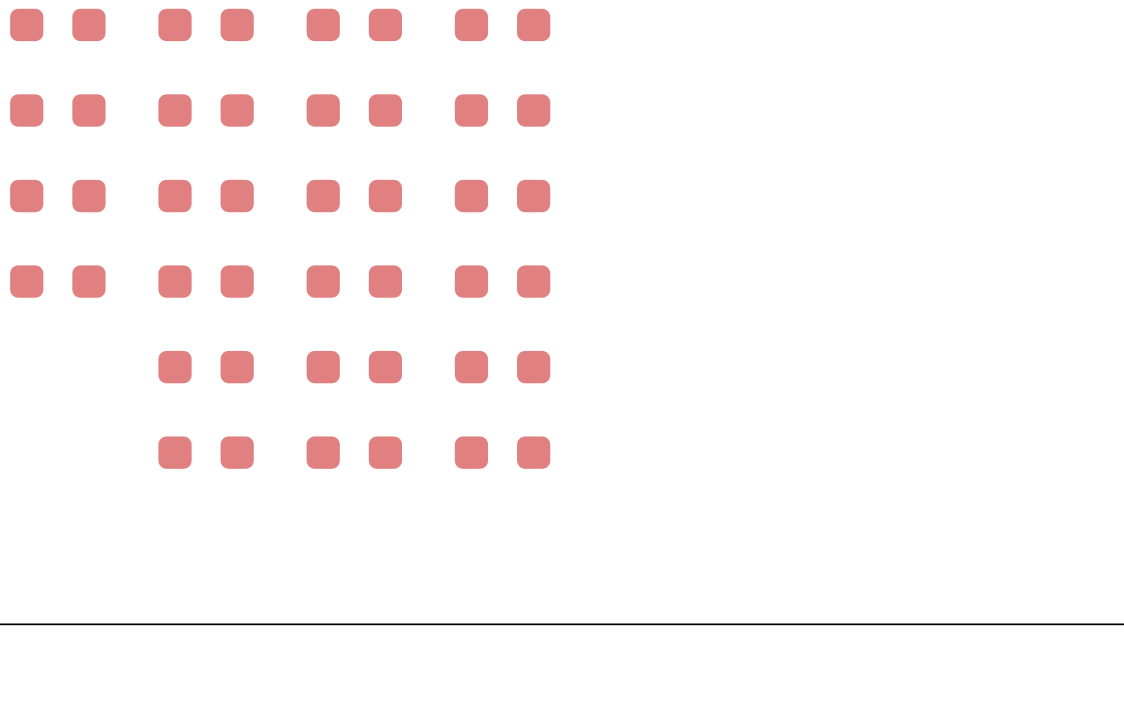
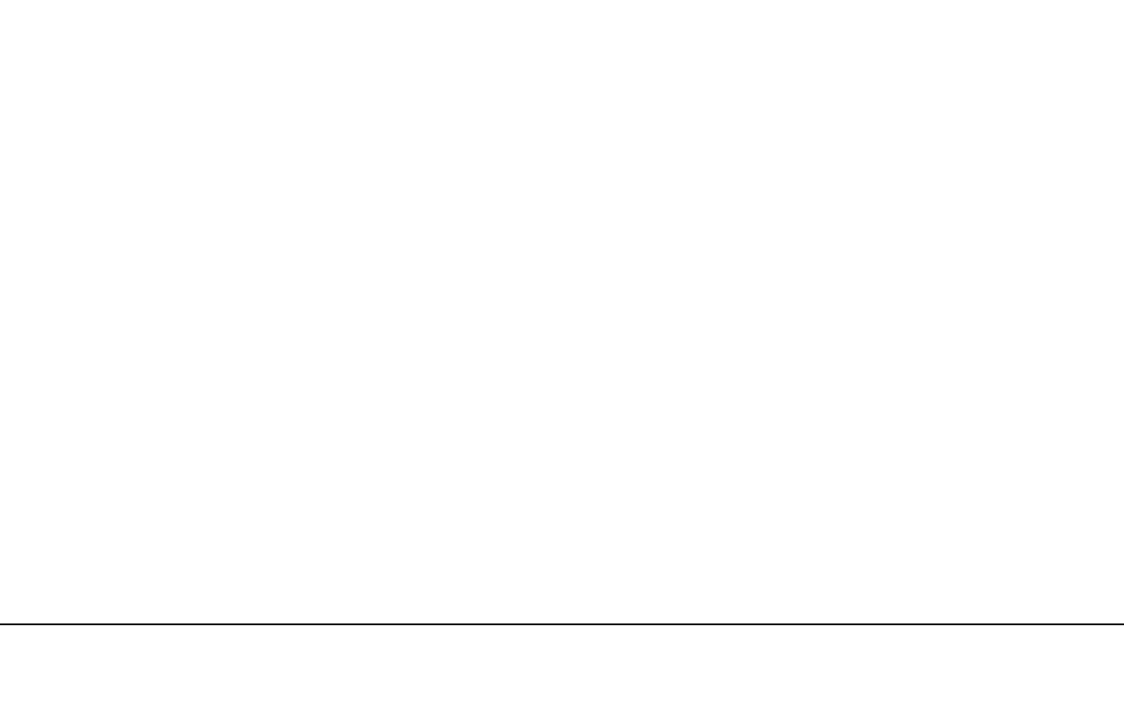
part: (57, 24) -> none
part: (206, 24) -> none
part: (354, 24) -> none
part: (502, 24) -> none
part: (57, 110) -> none
part: (206, 110) -> none
part: (354, 110) -> none
part: (502, 110) -> none
part: (57, 196) -> none
part: (206, 196) -> none
part: (354, 196) -> none
part: (502, 196) -> none
part: (57, 281) -> none
part: (206, 281) -> none
part: (354, 281) -> none
part: (502, 281) -> none
part: (206, 367) -> none
part: (354, 367) -> none
part: (502, 367) -> none
part: (206, 452) -> none
part: (354, 452) -> none
part: (502, 452) -> none

